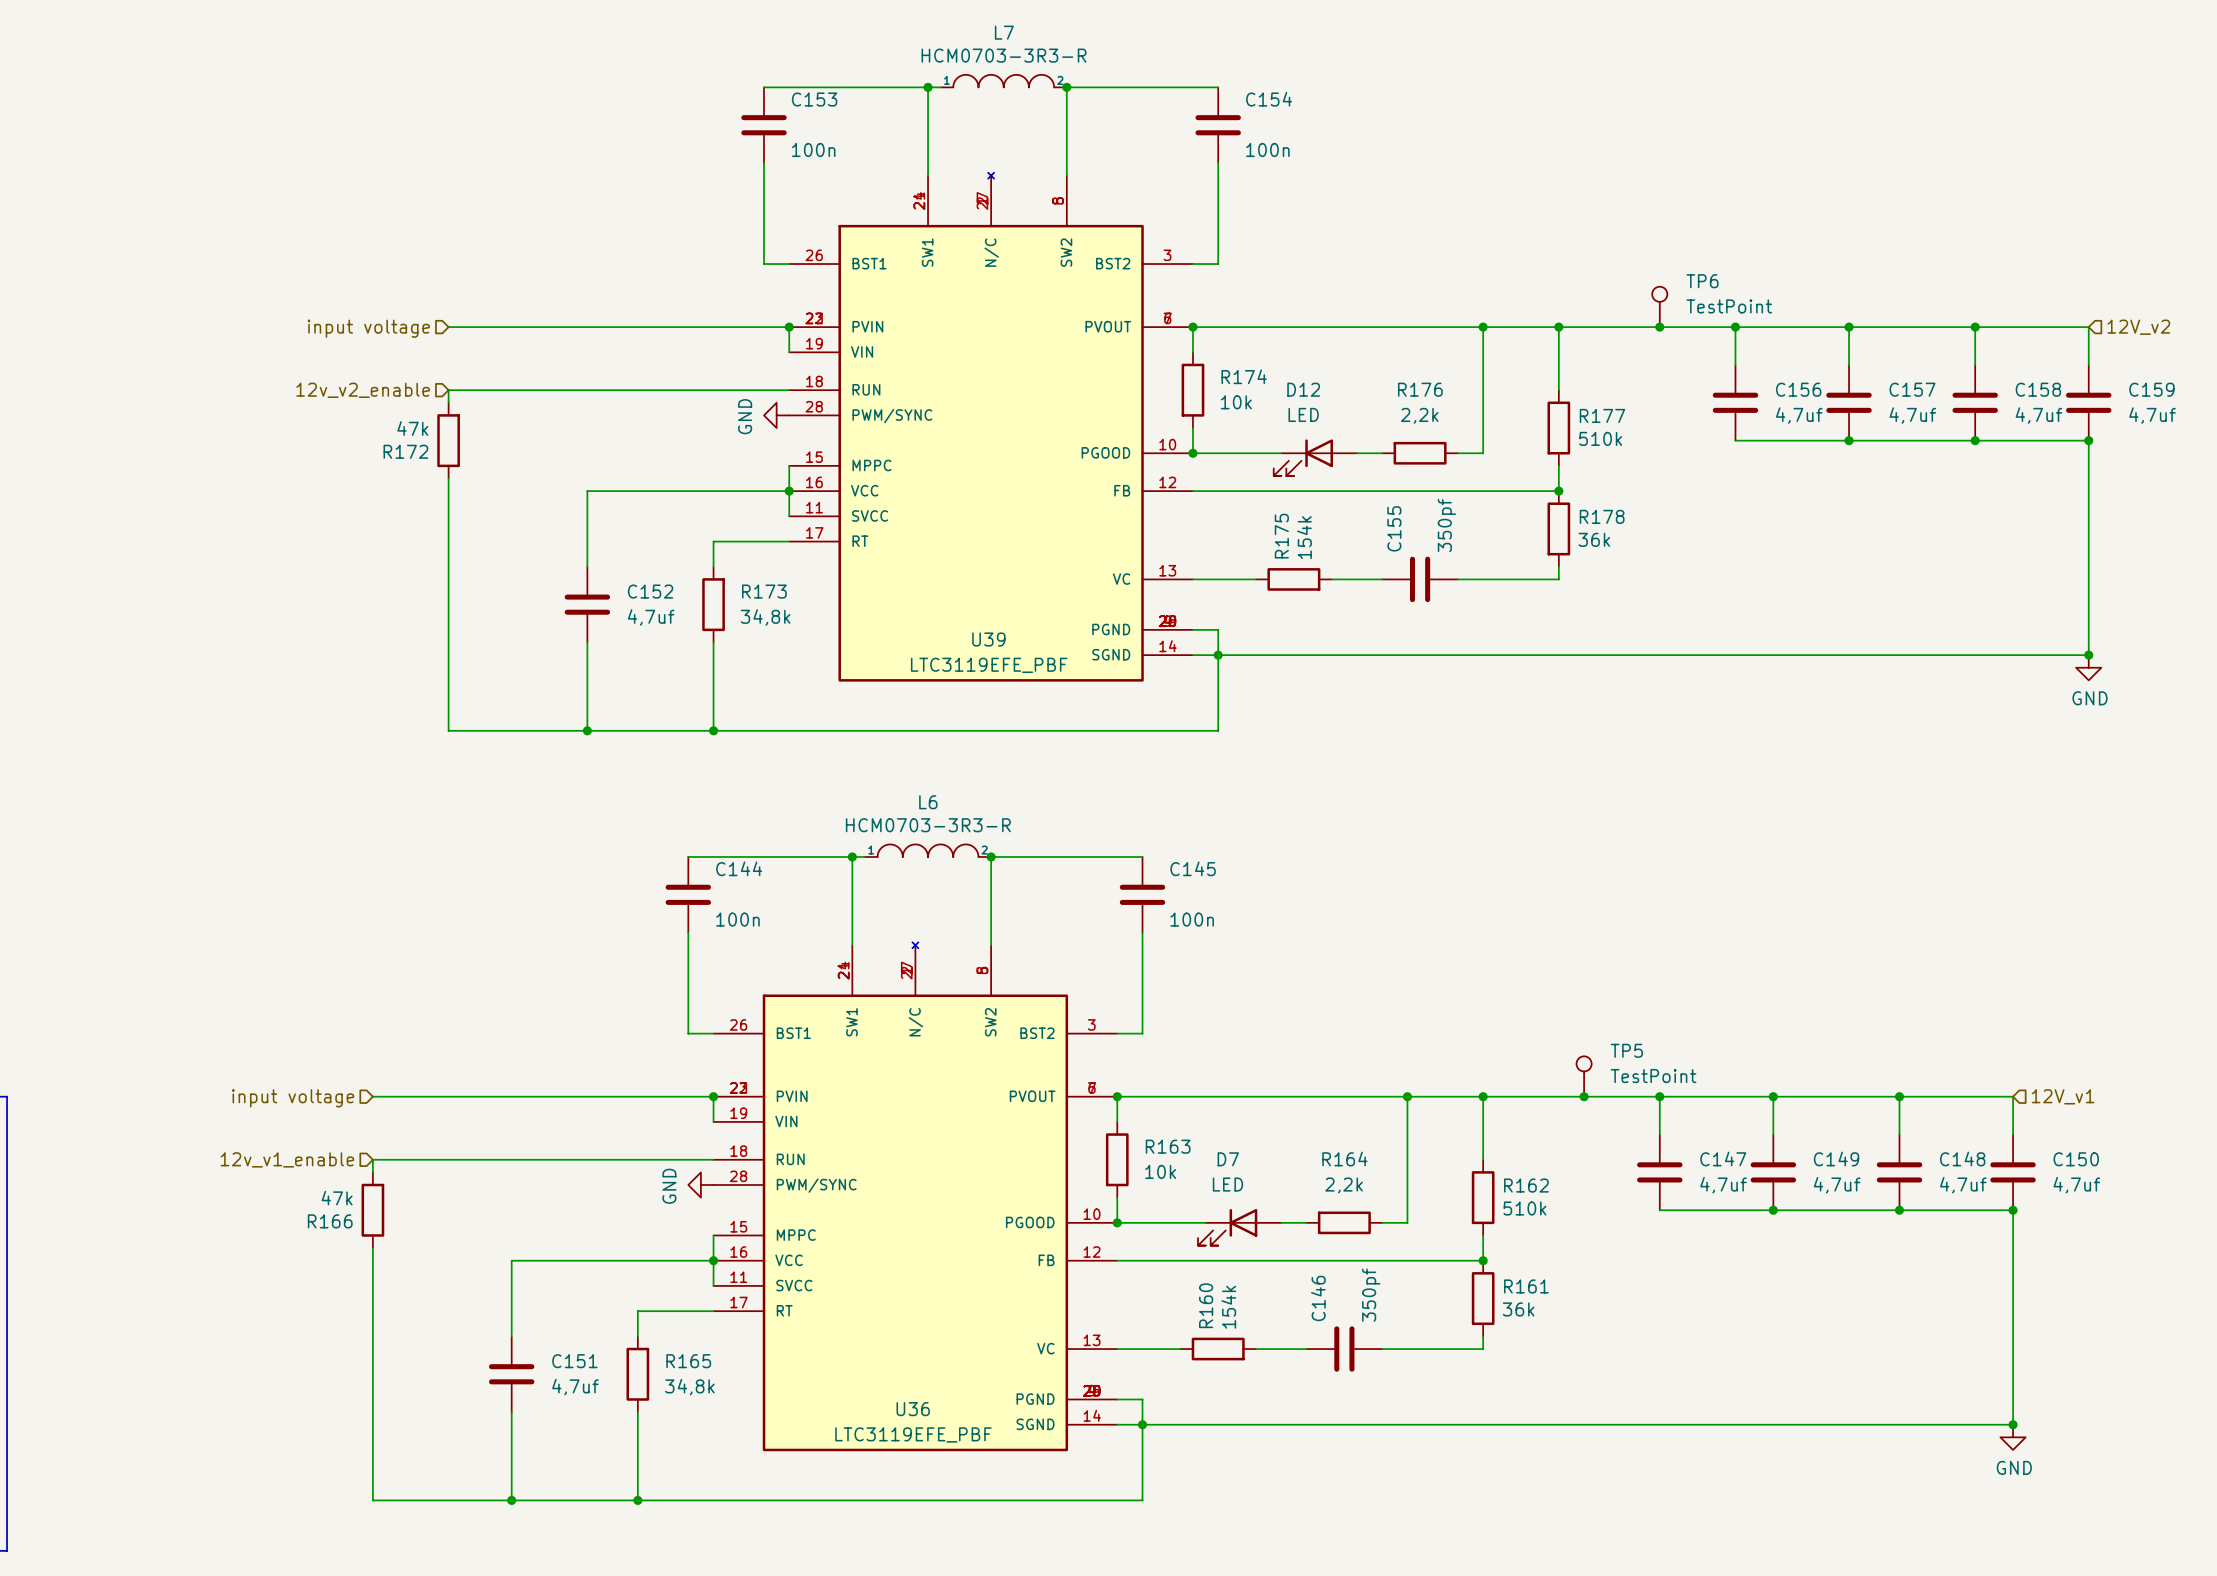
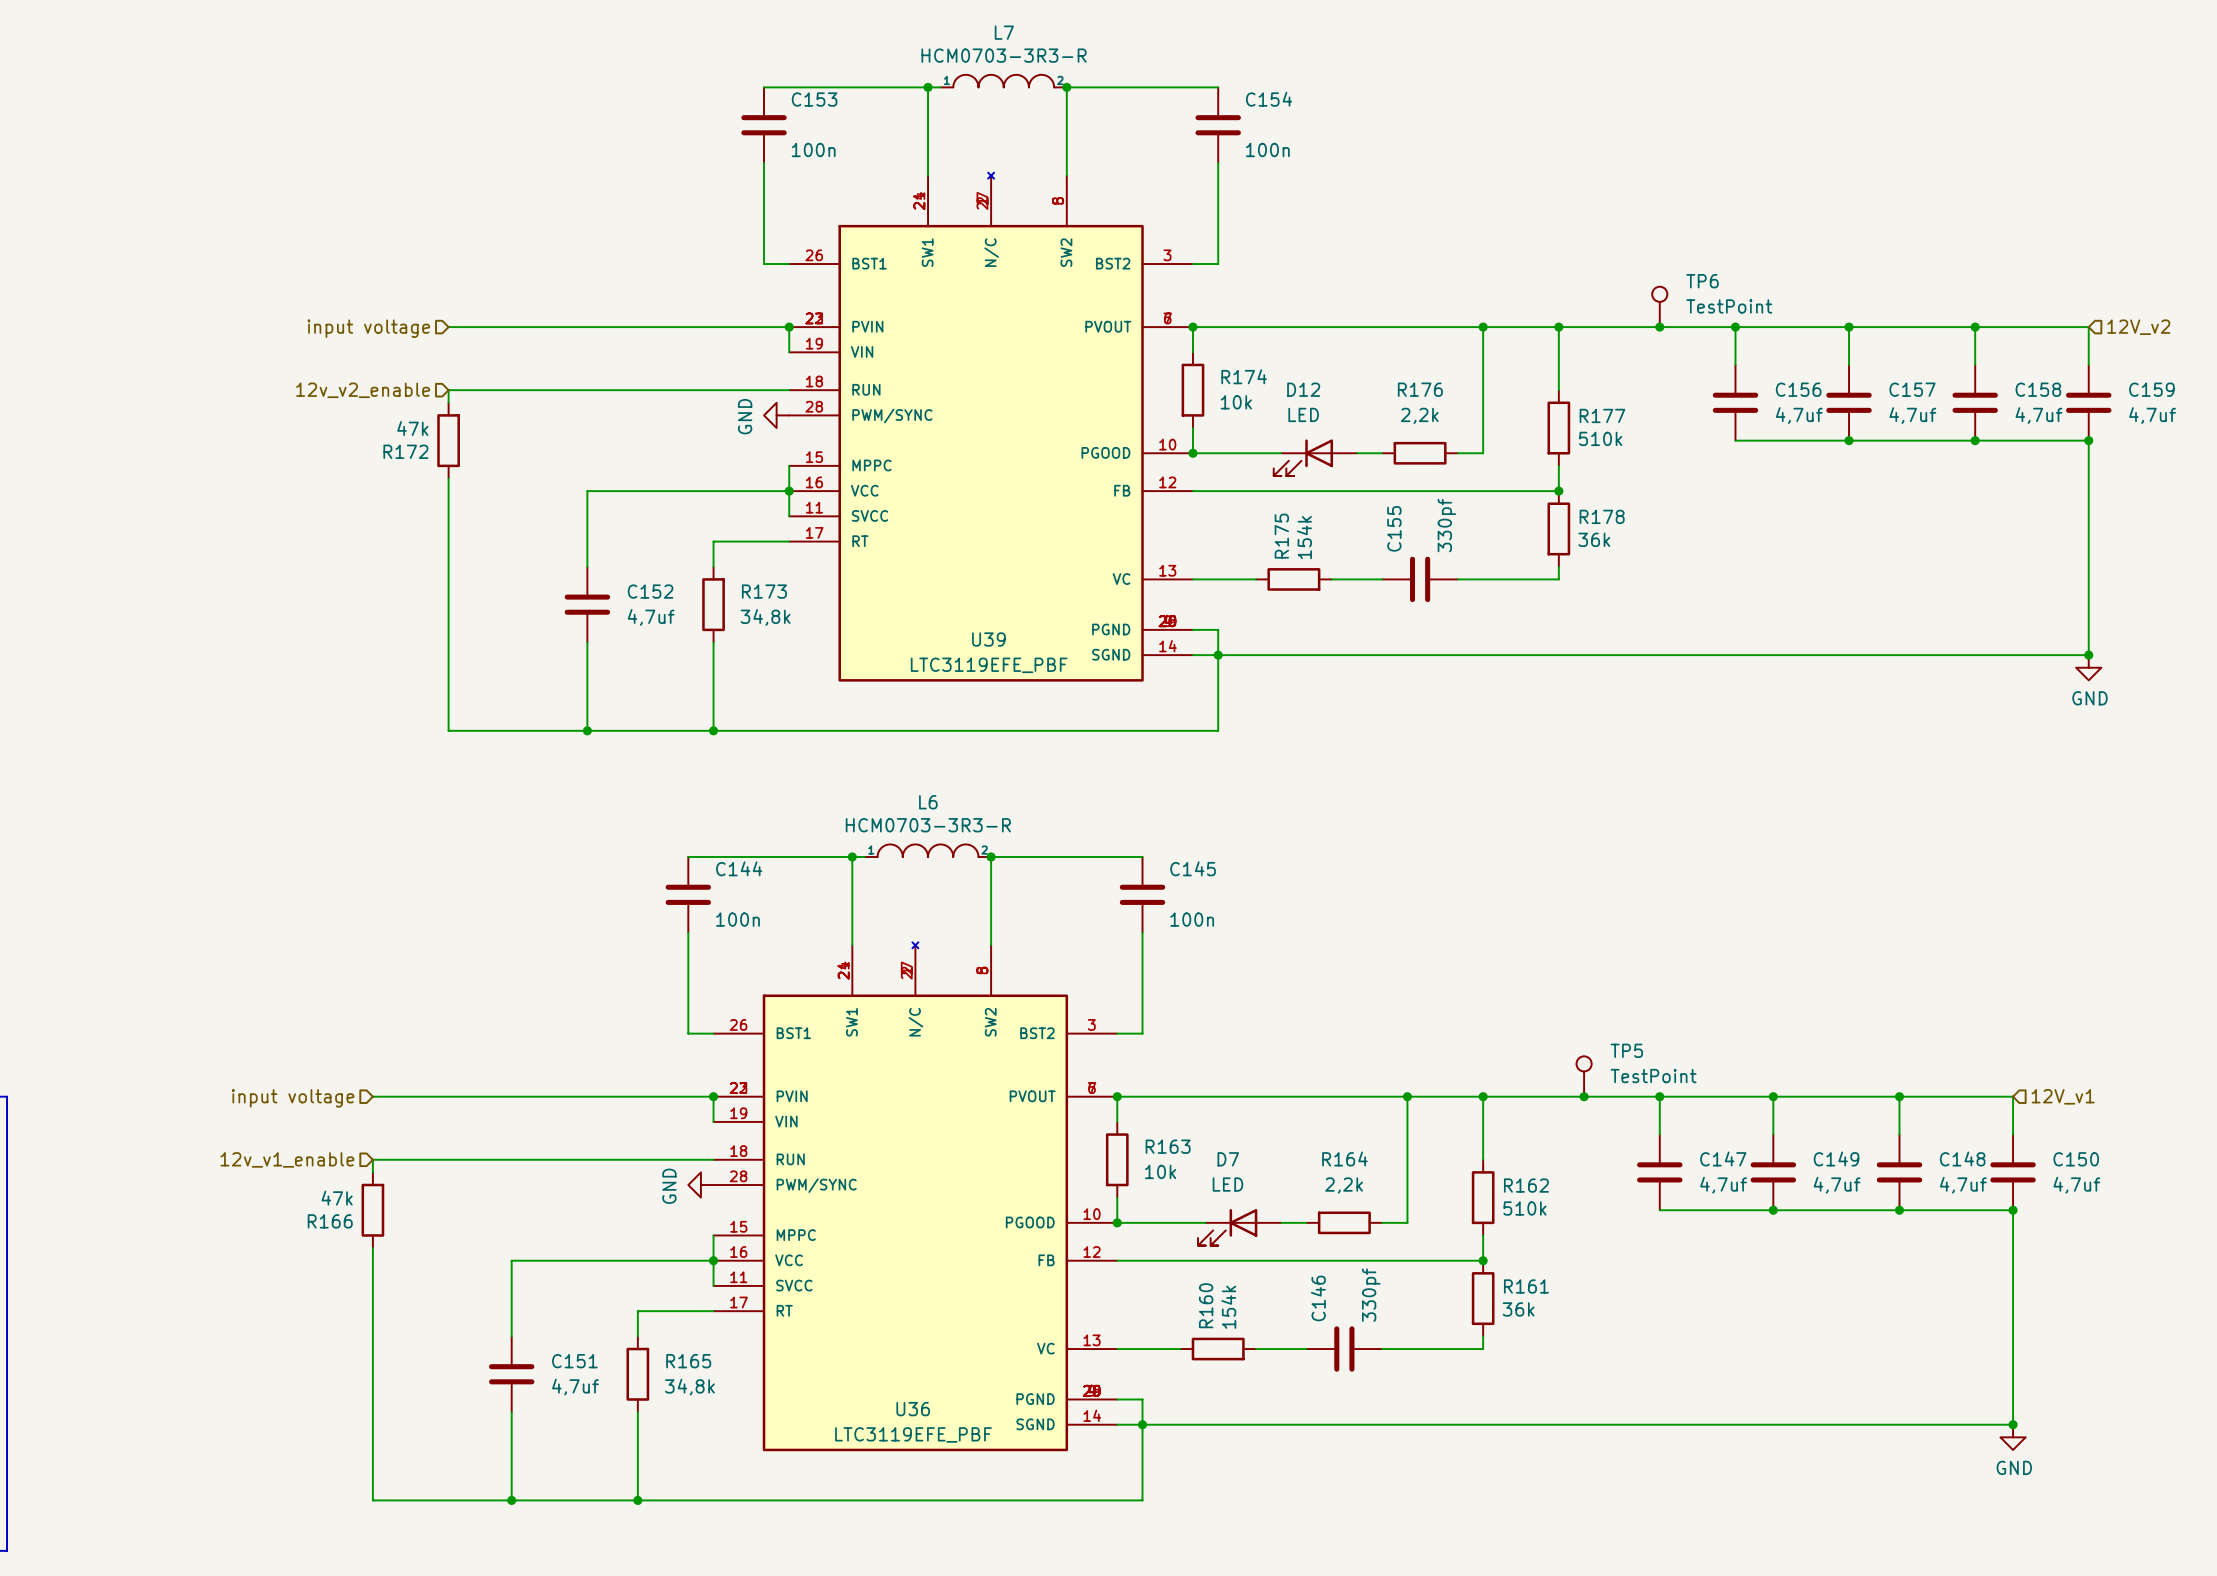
C155 value: 350pf (1446, 525) -> 330pf (1446, 525)
C146 value: 350pf (1371, 1295) -> 330pf (1371, 1295)

